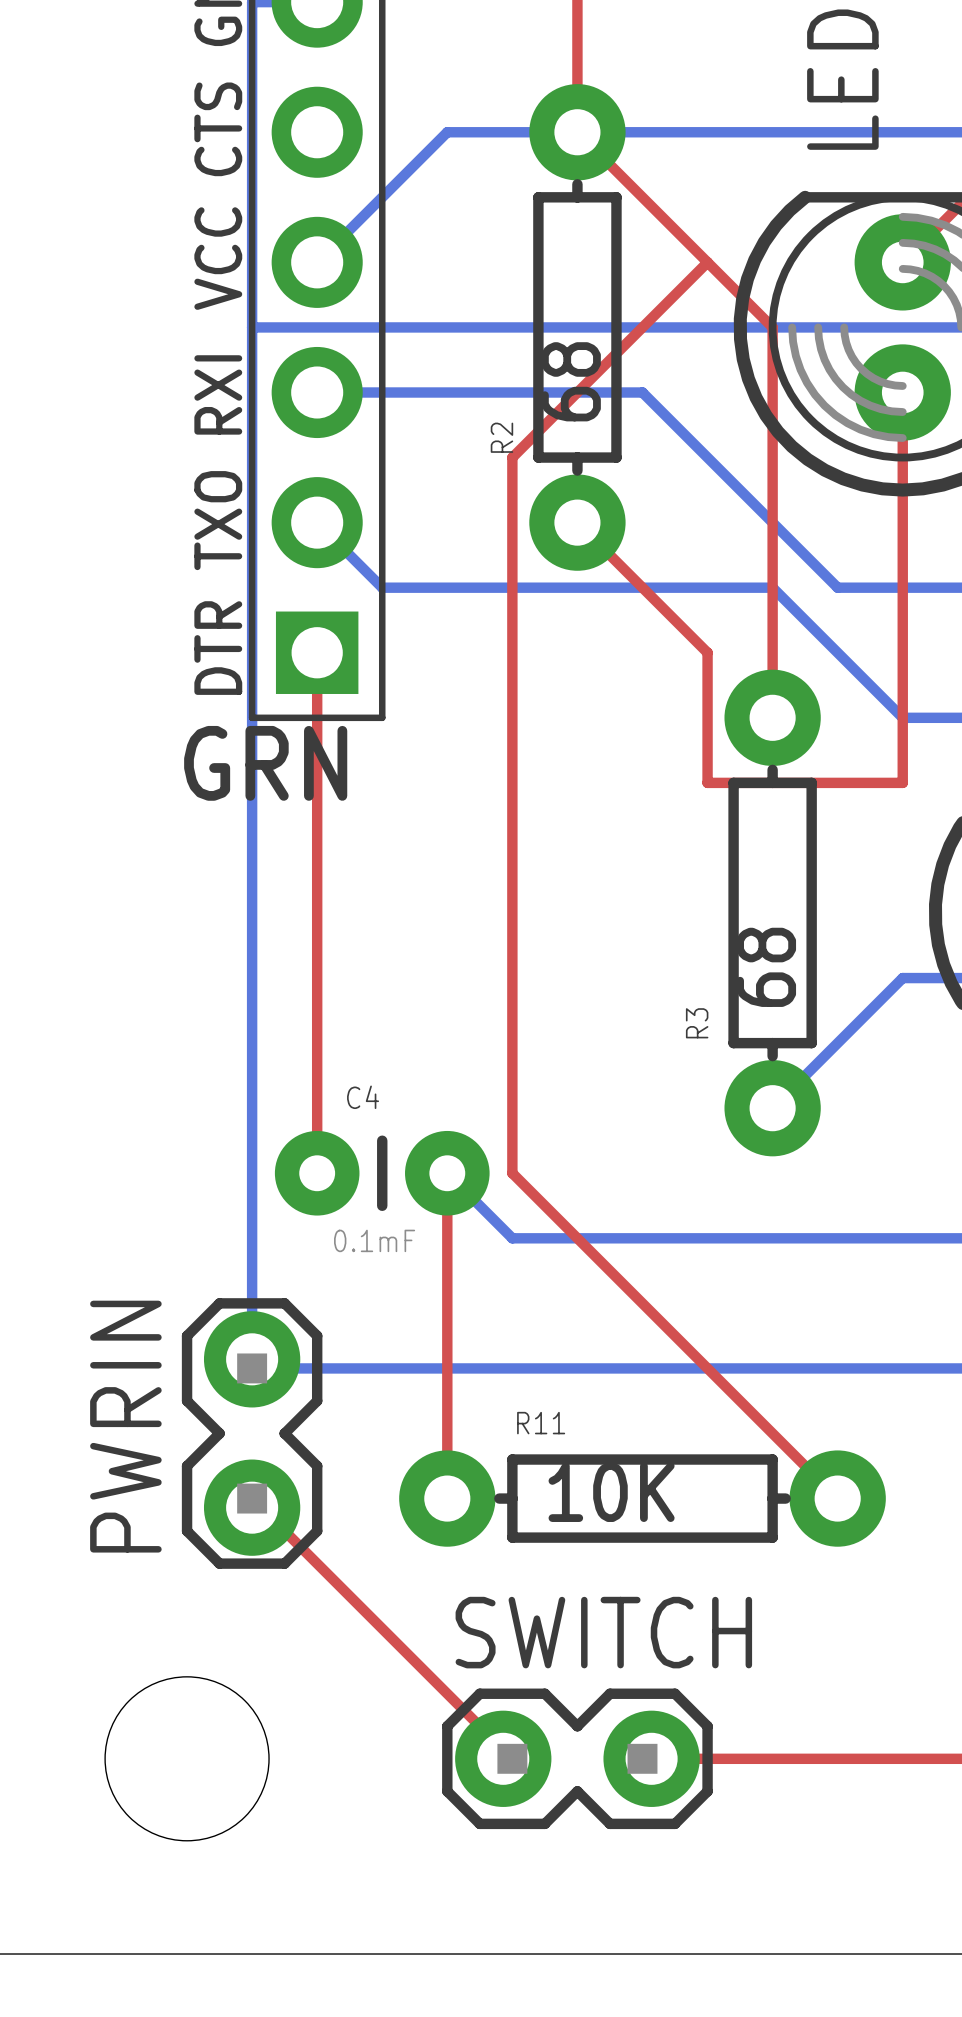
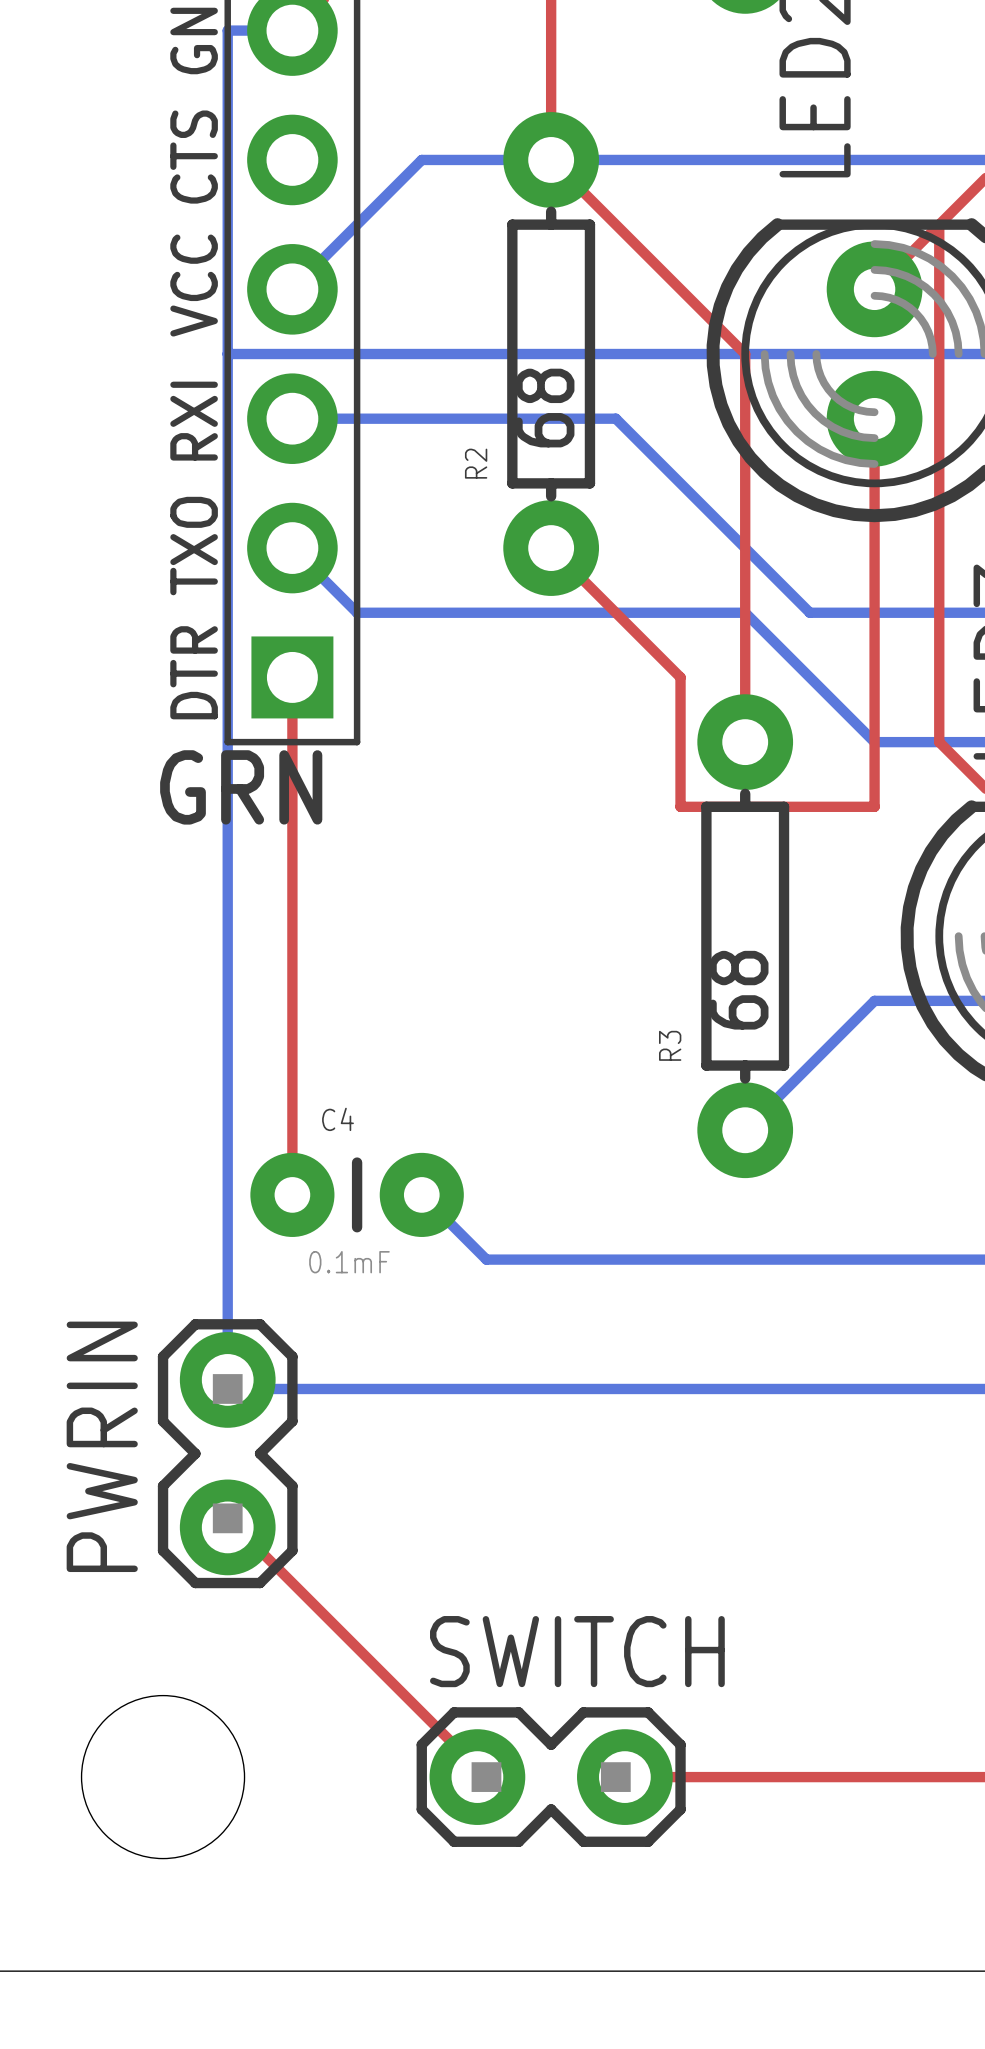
top track: (707, 262) (512, 457) (512, 1173) (837, 1498) -> none
top track: (447, 1173) (447, 1498) -> none
R11: 10K (642, 1498) -> none

